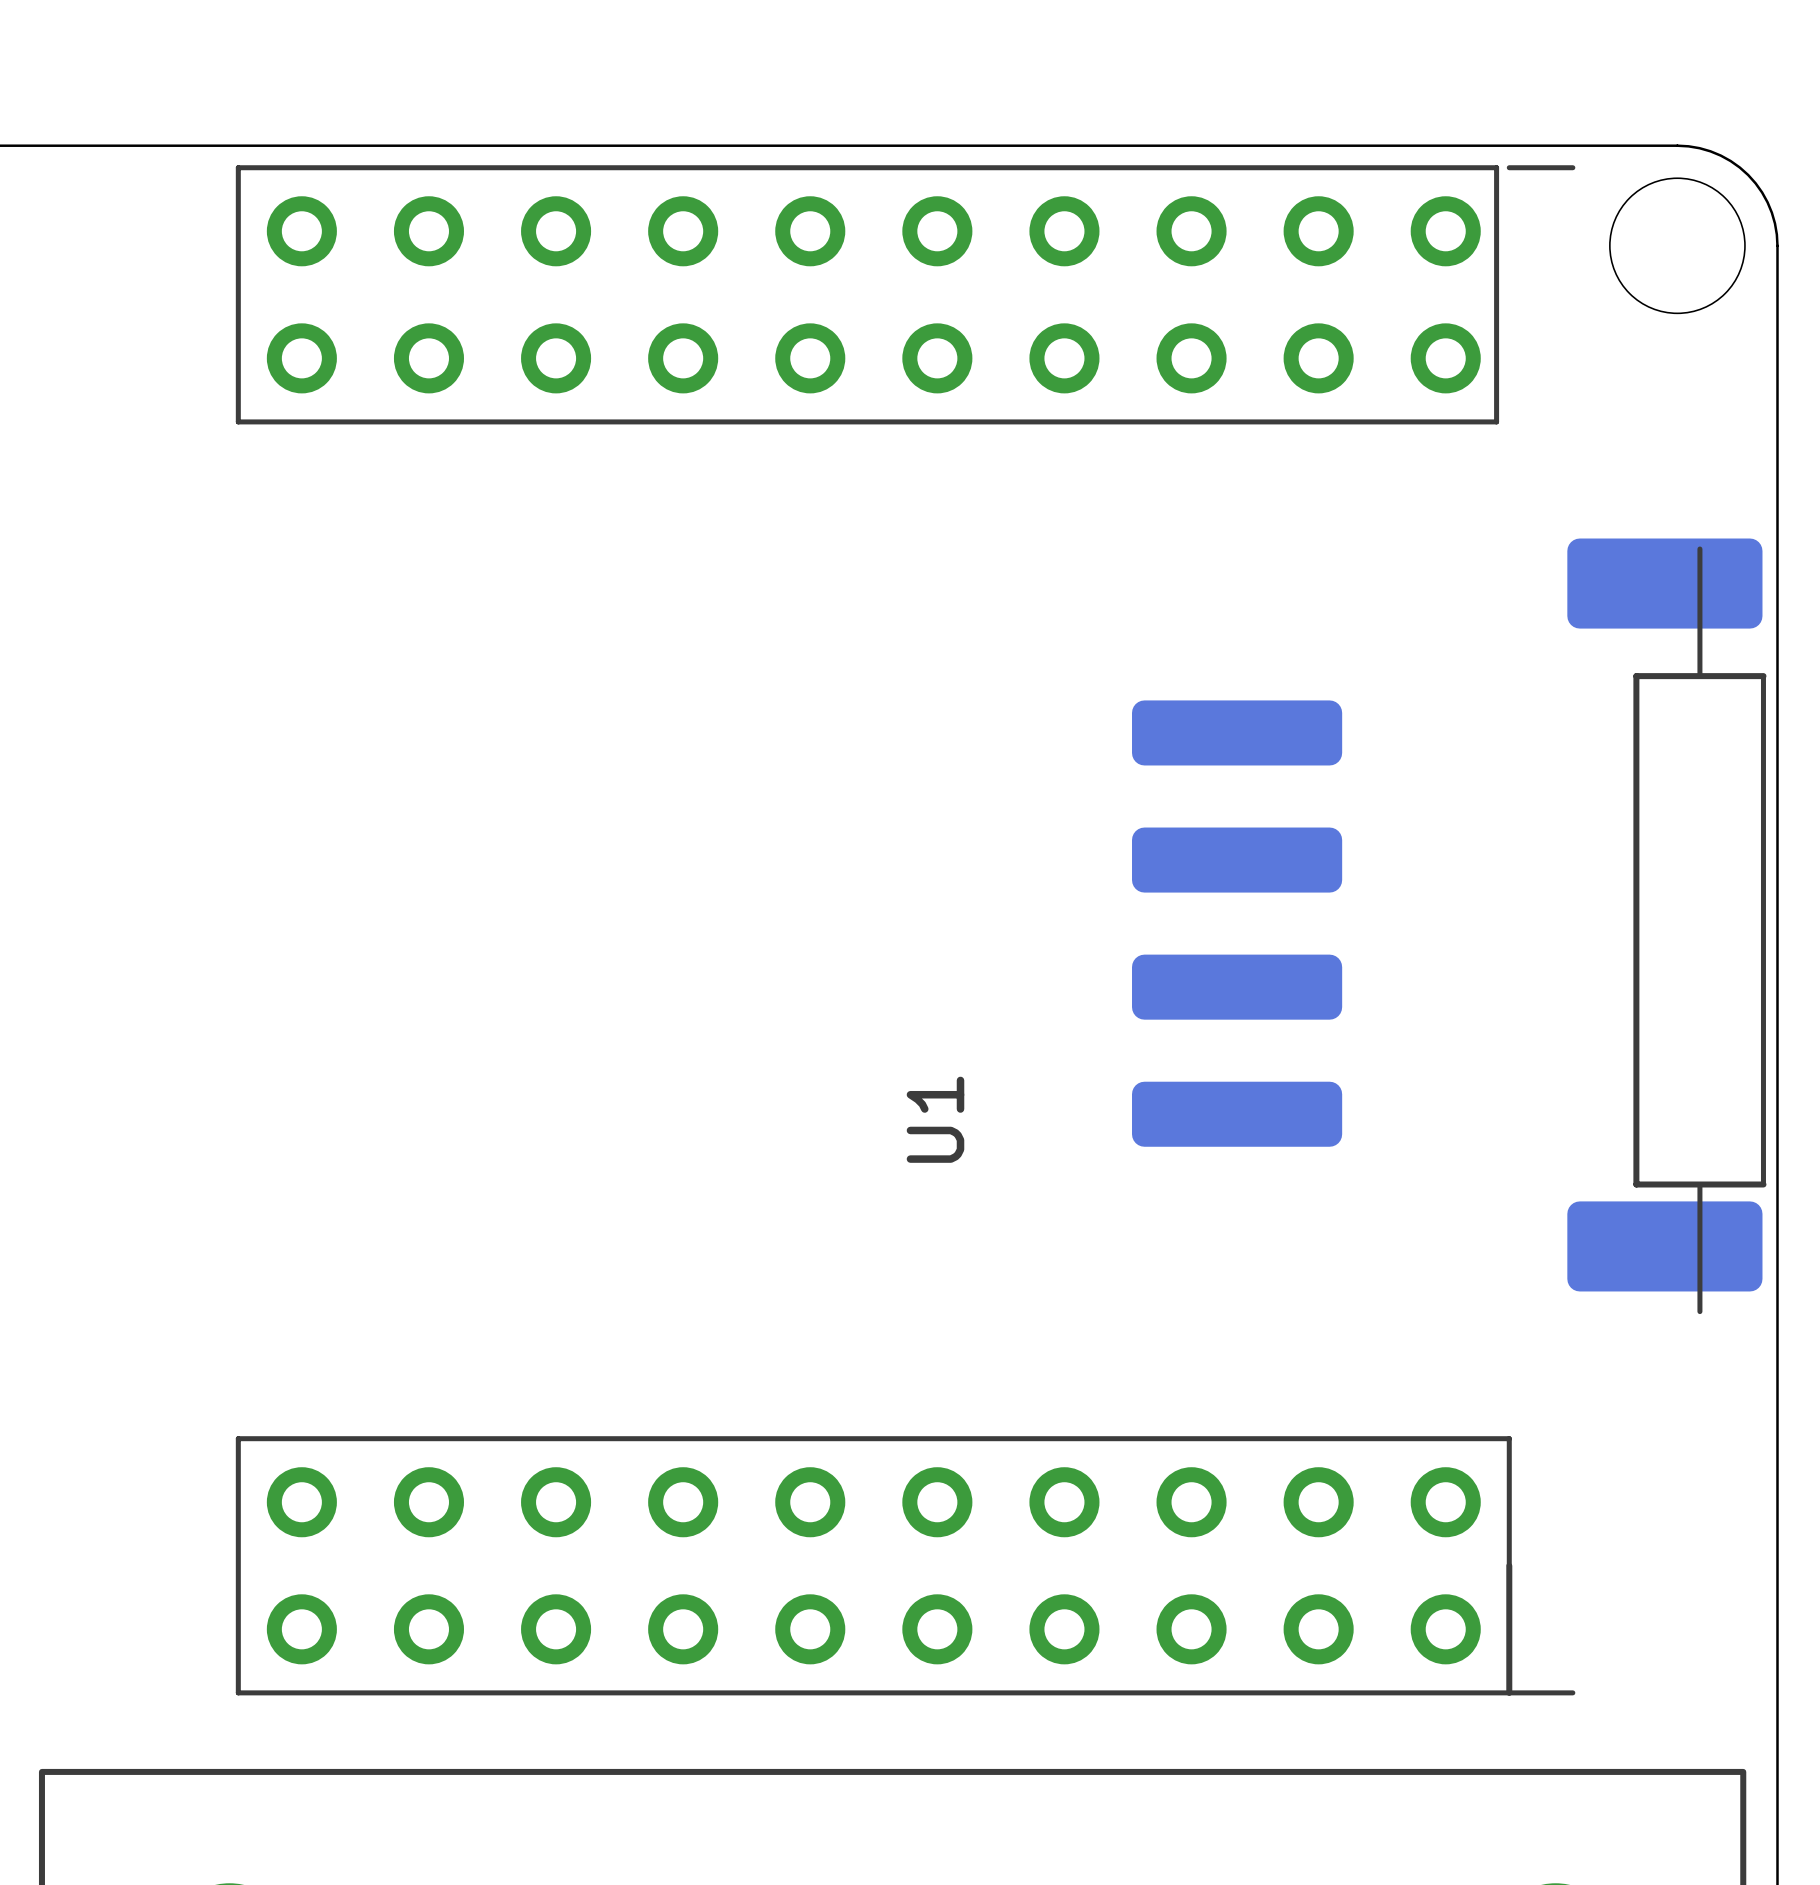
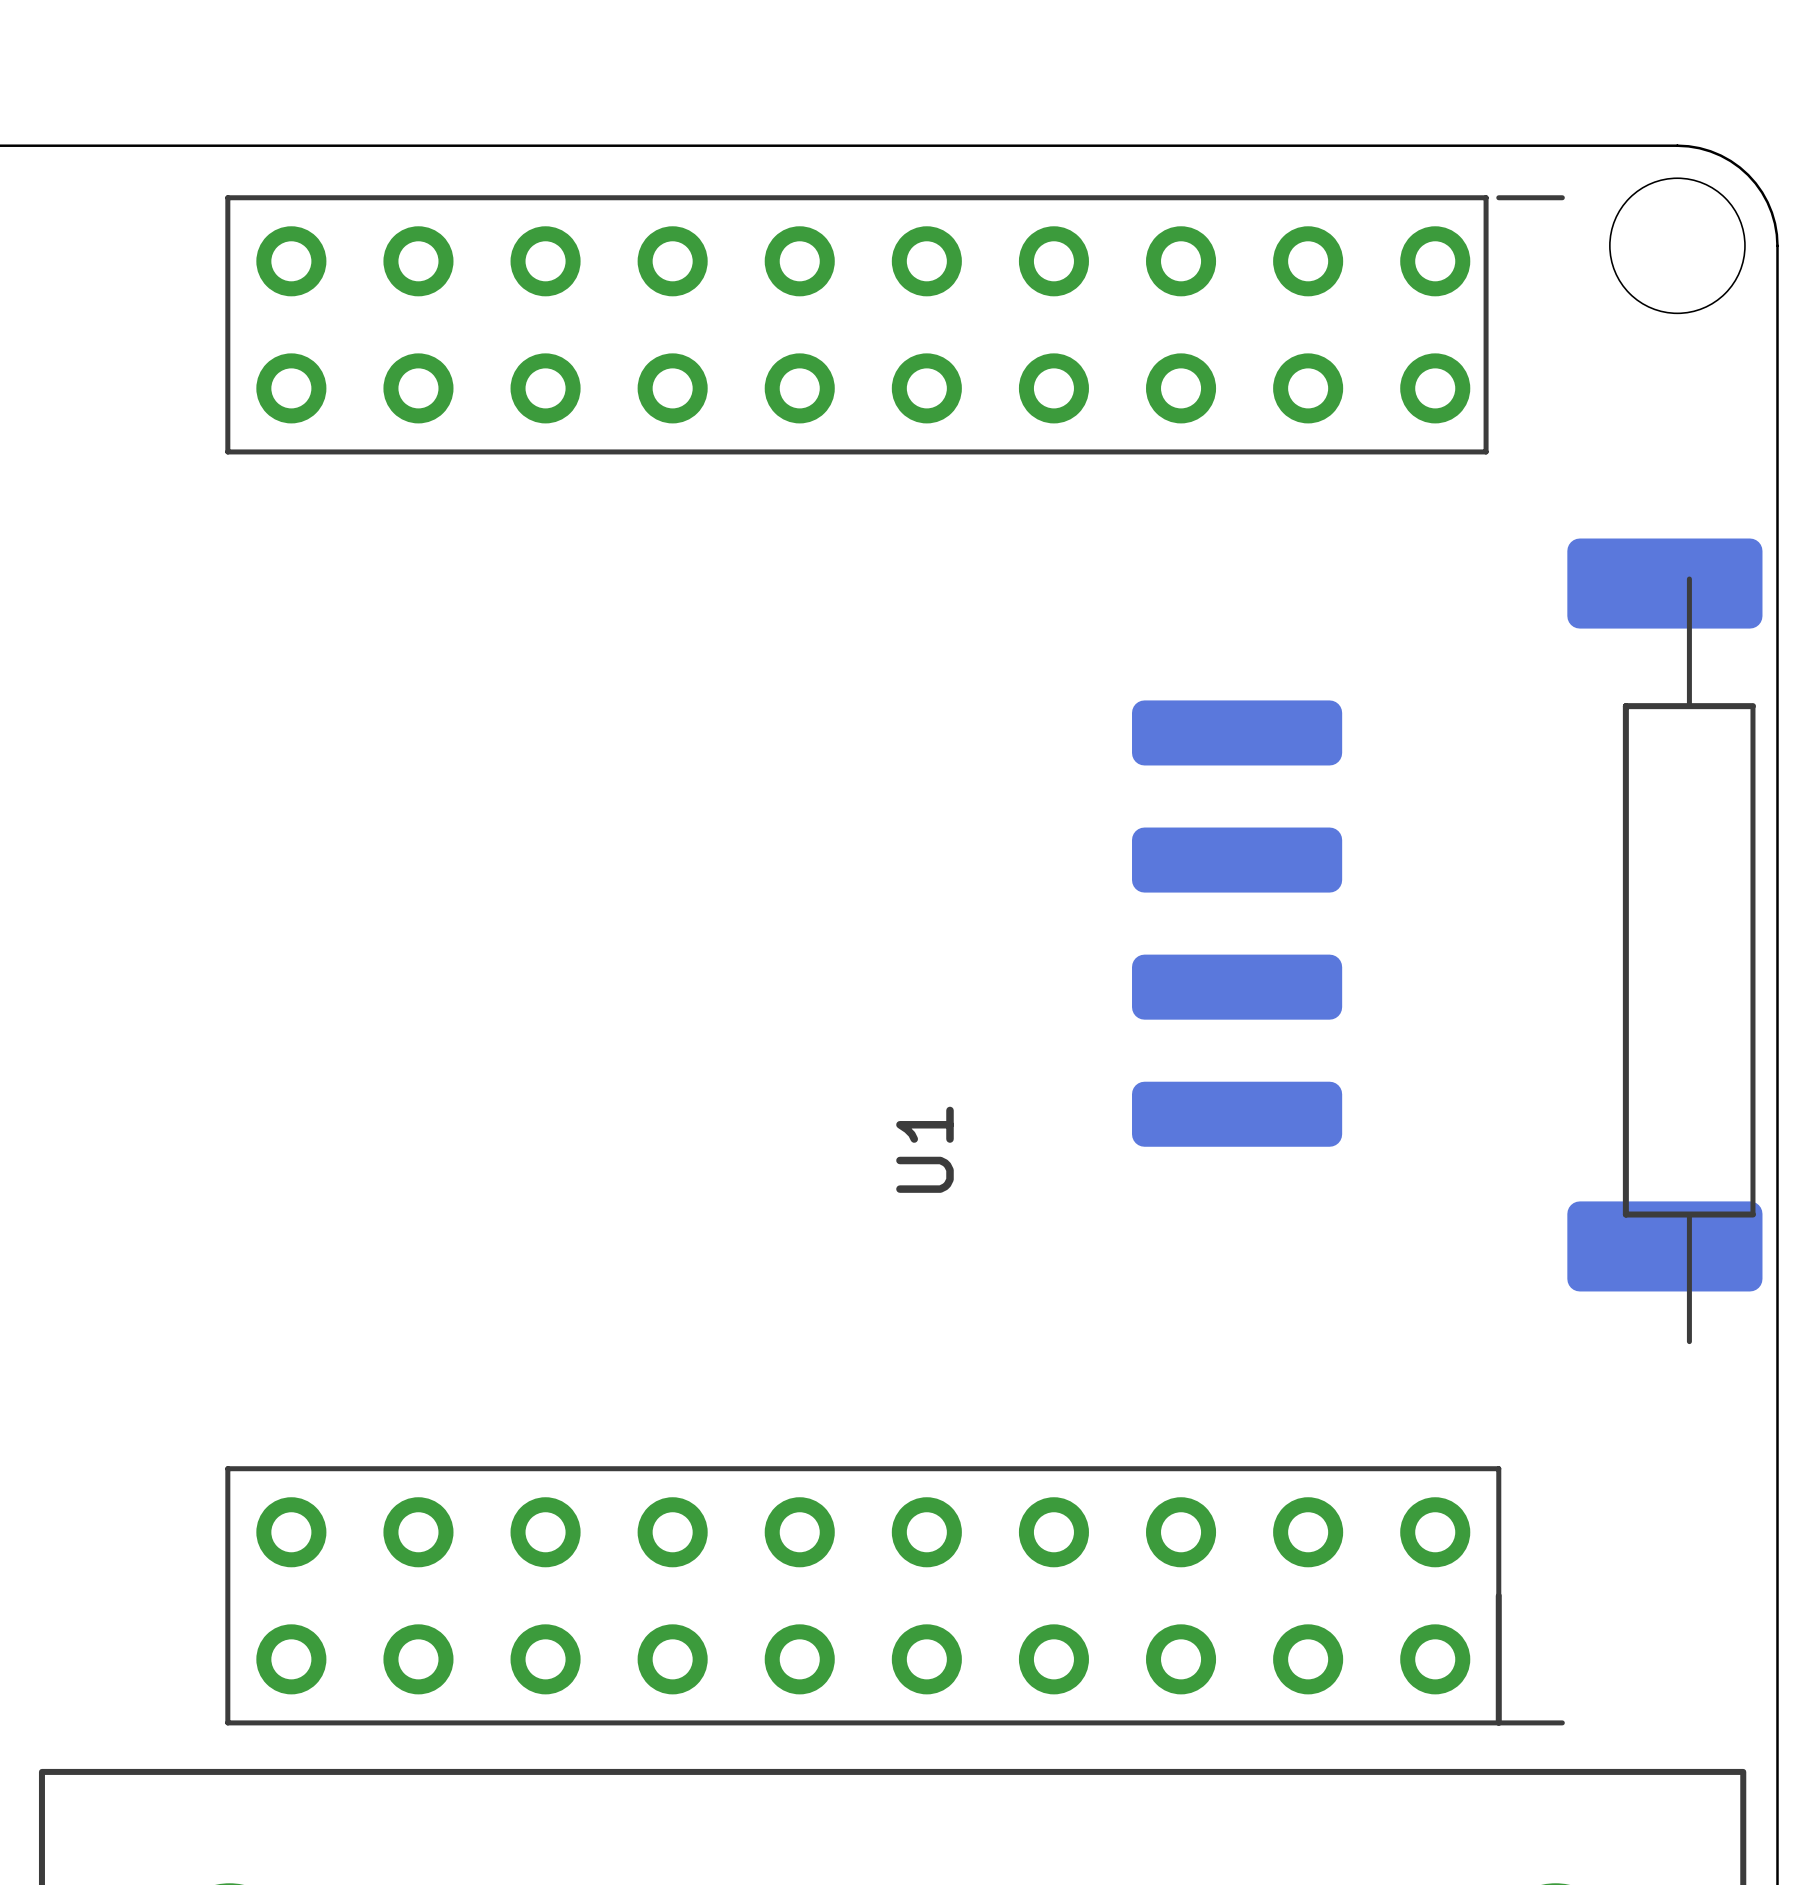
U1 position: (1001, 930) -> (990, 960)

